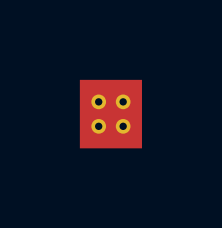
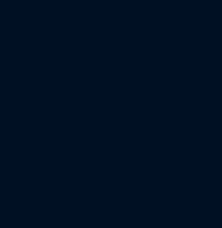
part: (110, 114) -> none

